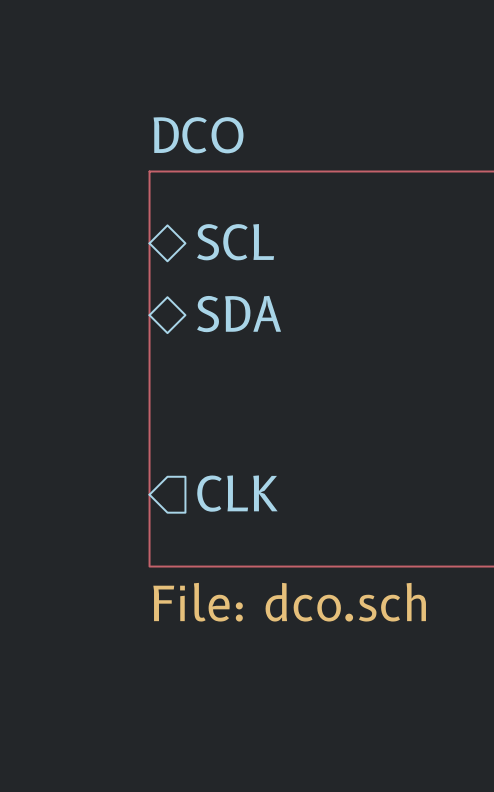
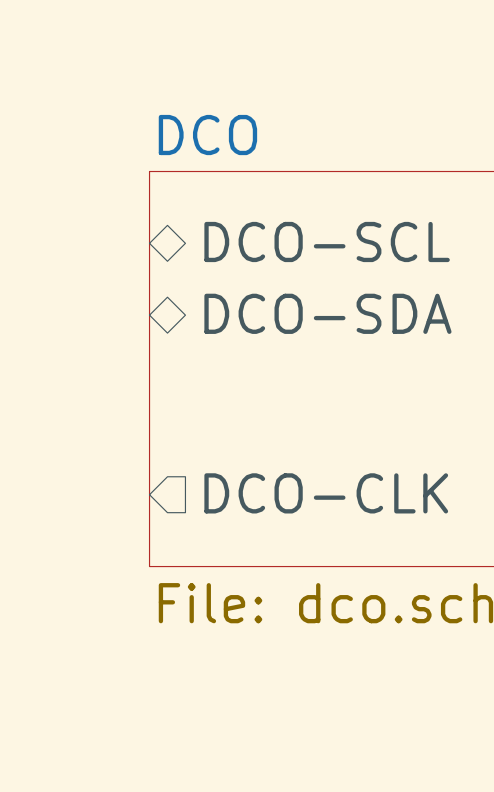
sheet pin: SCL (235, 242) -> DCO-SCL (327, 241)
sheet pin: SDA (239, 314) -> DCO-SDA (327, 313)
sheet pin: CLK (237, 493) -> DCO-CLK (326, 493)

